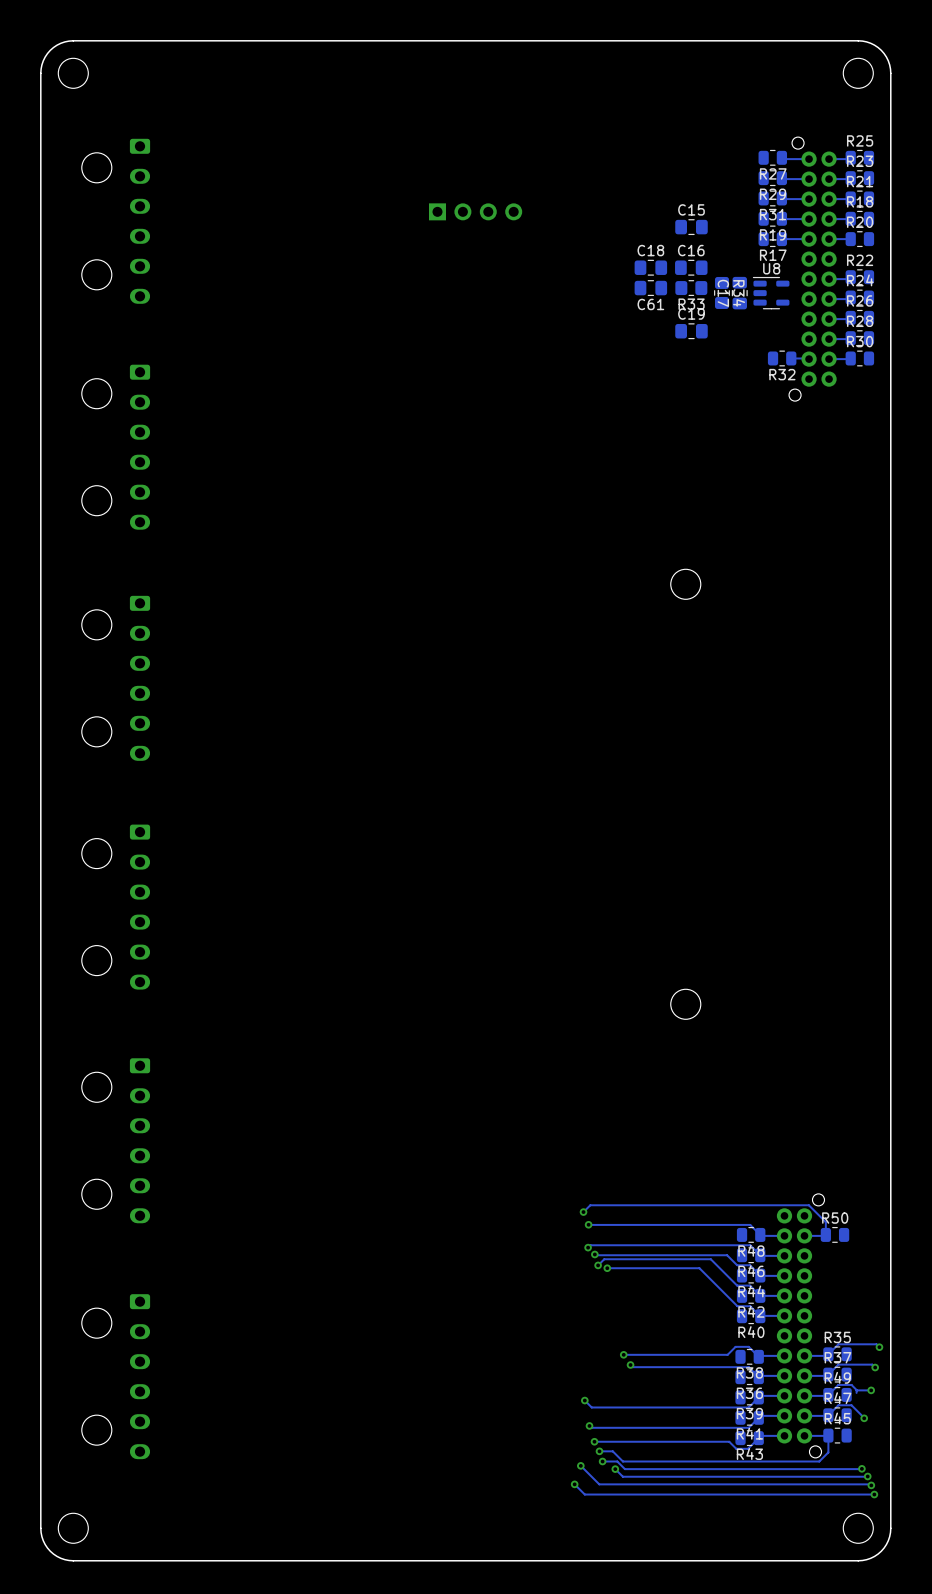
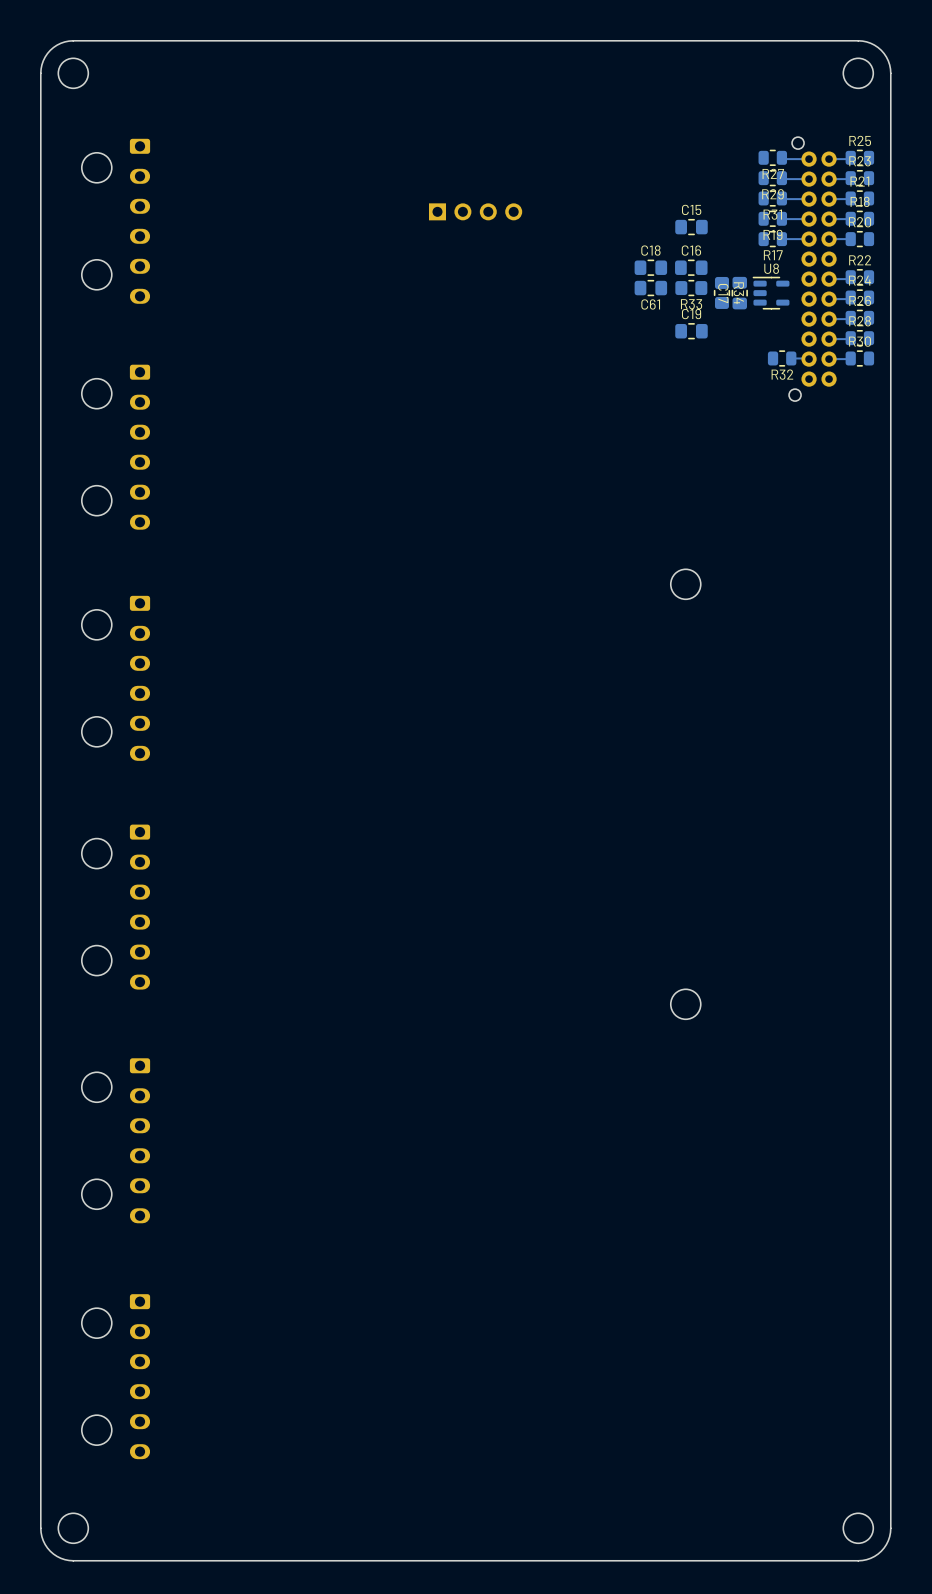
track: (583, 1212) (590, 1205) (808, 1205) (825, 1222) (825, 1234) (804, 1235) -> none
via: (583, 1212) -> none
track: (588, 1224) (750, 1224) (761, 1235) (784, 1235) -> none
via: (588, 1224) -> none
R48: (751, 1234) -> none
R50: (834, 1234) -> none
track: (588, 1247) (590, 1245) (750, 1245) (760, 1255) (784, 1255) -> none
via: (588, 1247) -> none
track: (594, 1254) (727, 1255) (737, 1265) (749, 1265) (760, 1275) (784, 1275) -> none
via: (594, 1254) -> none
R46: (751, 1255) -> none
track: (598, 1265) (604, 1259) (710, 1259) (737, 1285) (749, 1285) (760, 1295) (784, 1295) -> none
via: (598, 1265) -> none
track: (607, 1268) (699, 1268) (737, 1306) (750, 1306) (760, 1316) (784, 1315) -> none
via: (607, 1268) -> none
R44: (751, 1275) -> none
R42: (751, 1295) -> none
R40: (751, 1316) -> none
part: (800, 1325) -> none
track: (879, 1347) (876, 1344) (838, 1344) (828, 1354) -> none
via: (879, 1347) -> none
track: (623, 1354) (727, 1354) (735, 1346) (748, 1346) (758, 1356) (784, 1355) -> none
via: (623, 1354) -> none
track: (829, 1354) (804, 1355) -> none
R35: (837, 1354) -> none
R38: (749, 1356) -> none
track: (630, 1364) (632, 1367) (748, 1367) (758, 1377) (784, 1375) -> none
via: (630, 1364) -> none
track: (875, 1367) (872, 1364) (838, 1364) (827, 1375) (804, 1375) -> none
via: (875, 1367) -> none
R37: (837, 1374) -> none
R36: (749, 1377) -> none
track: (871, 1390) (856, 1390) -> none
via: (871, 1390) -> none
track: (856, 1392) (856, 1390) (851, 1384) (838, 1384) (827, 1395) (804, 1395) -> none
R49: (837, 1394) -> none
track: (784, 1395) (759, 1397) -> none
R39: (749, 1397) -> none
track: (758, 1397) (748, 1407) (591, 1407) (584, 1400) -> none
via: (584, 1400) -> none
track: (784, 1415) (760, 1415) (748, 1427) (591, 1427) (589, 1425) -> none
track: (804, 1415) (827, 1415) (838, 1405) (851, 1405) (864, 1418) -> none
R47: (837, 1415) -> none
R41: (749, 1417) -> none
via: (864, 1418) -> none
via: (589, 1425) -> none
track: (784, 1435) (761, 1435) (748, 1448) (736, 1448) (729, 1441) (594, 1441) -> none
track: (804, 1435) (828, 1435) (828, 1452) (819, 1461) (622, 1461) (612, 1451) (599, 1451) -> none
R45: (837, 1435) -> none
R43: (749, 1438) -> none
via: (594, 1441) -> none
via: (599, 1451) -> none
track: (602, 1461) (617, 1461) (624, 1469) (861, 1468) -> none
via: (602, 1461) -> none
track: (580, 1465) (599, 1484) (871, 1485) -> none
via: (580, 1465) -> none
via: (861, 1468) -> none
track: (615, 1469) (622, 1476) (867, 1476) -> none
via: (615, 1469) -> none
via: (867, 1476) -> none
track: (574, 1484) (584, 1494) (874, 1494) -> none
via: (574, 1484) -> none
via: (871, 1485) -> none
via: (874, 1494) -> none

